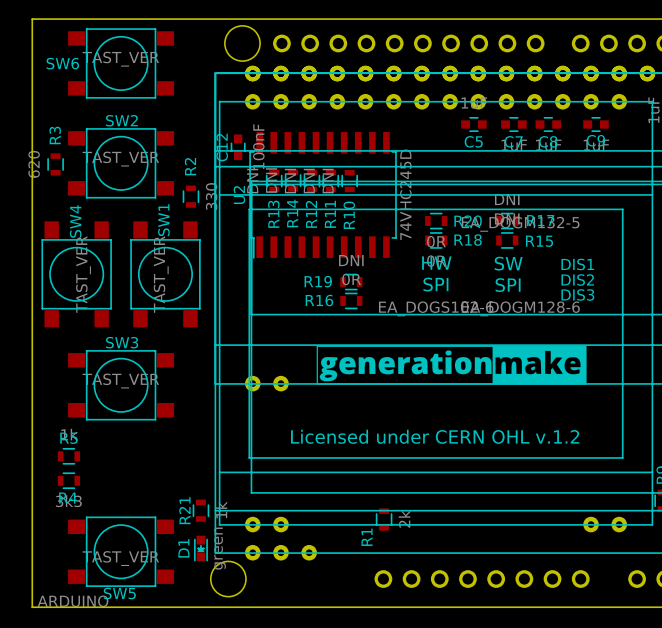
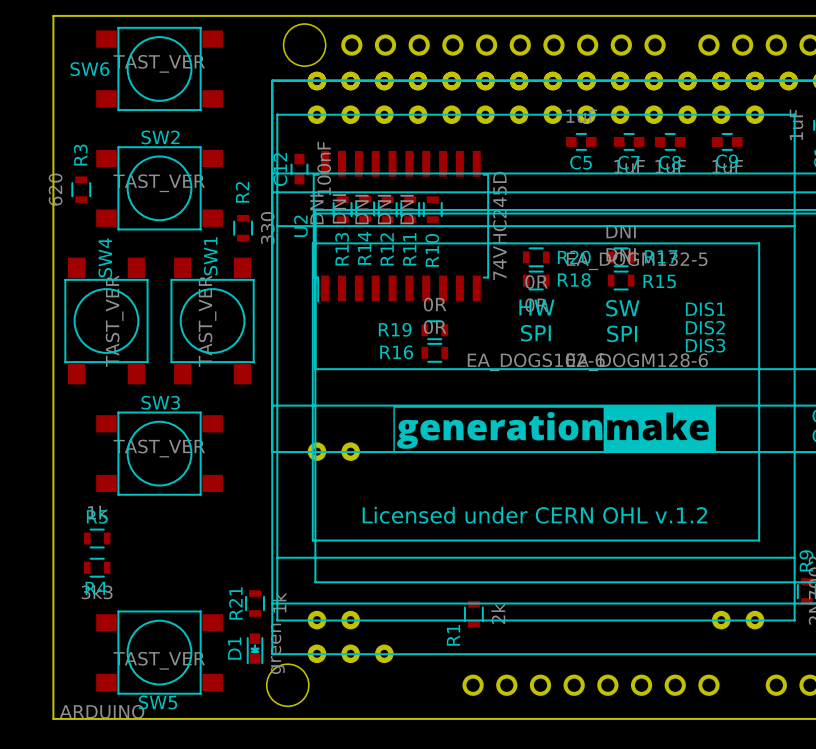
R19 value: DNI (351, 260) -> 0R (435, 304)

